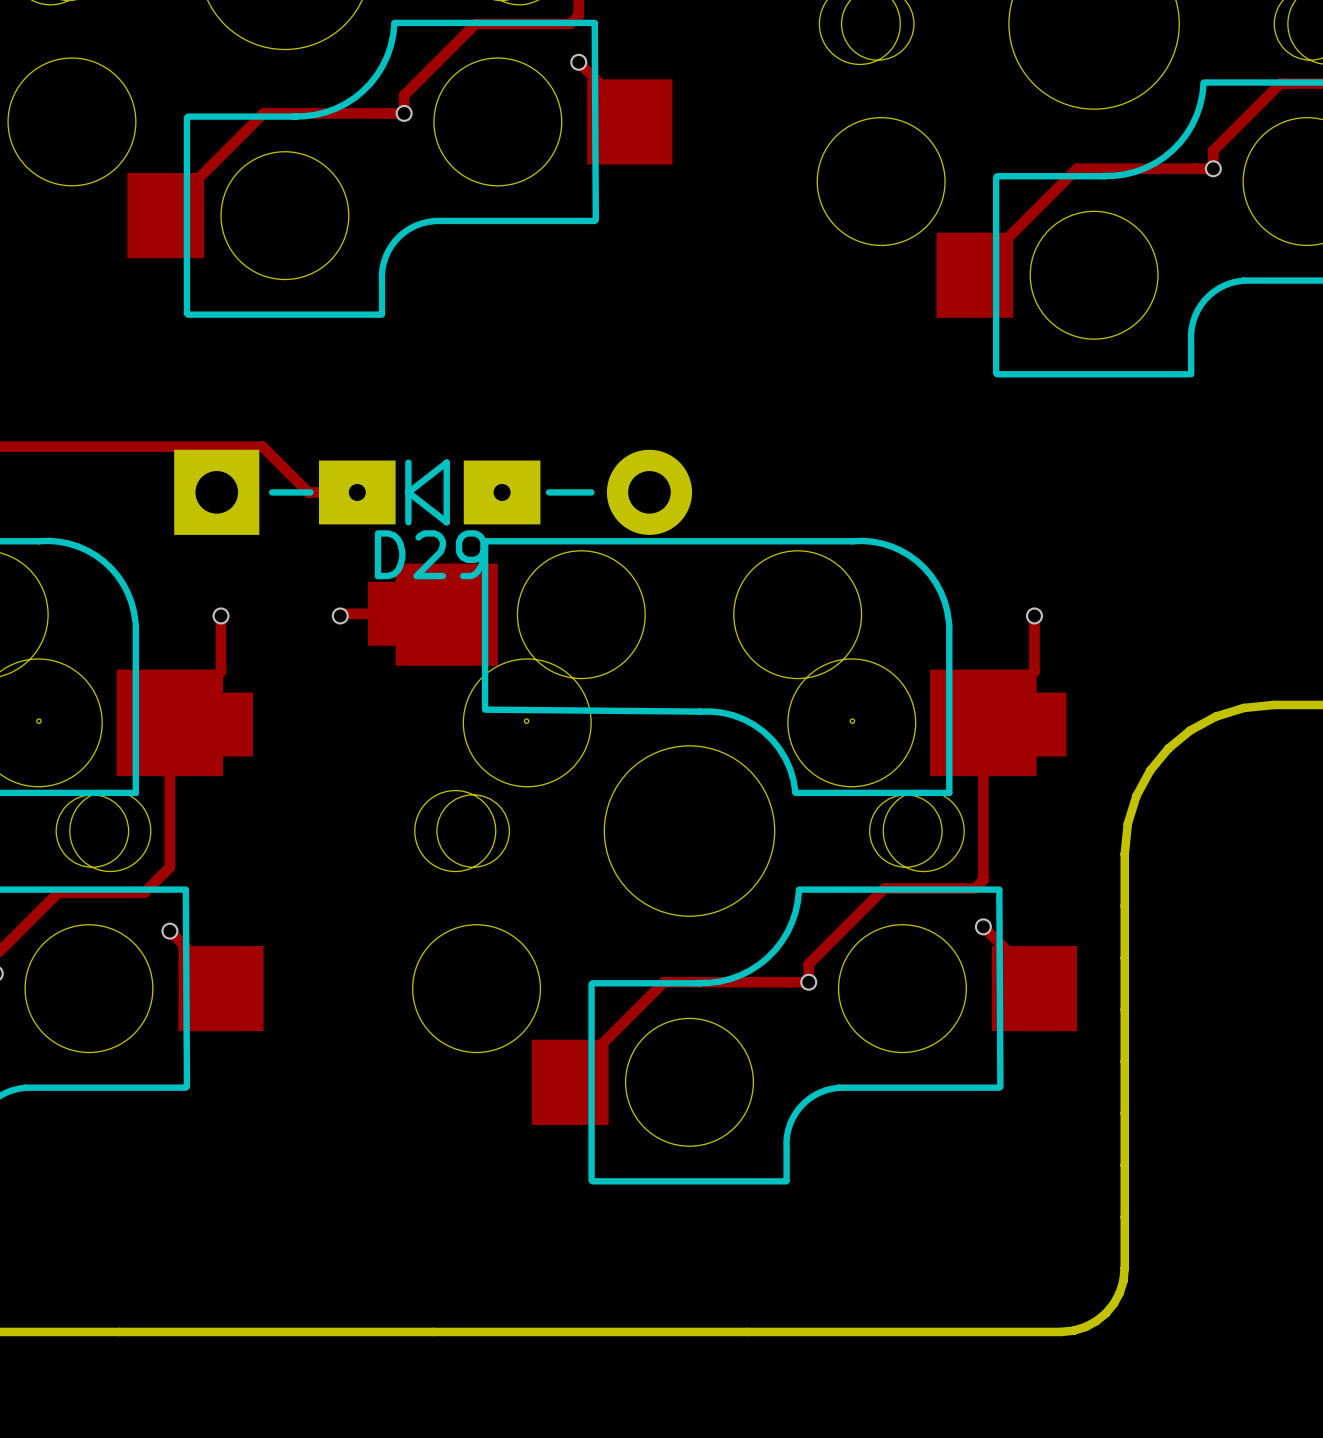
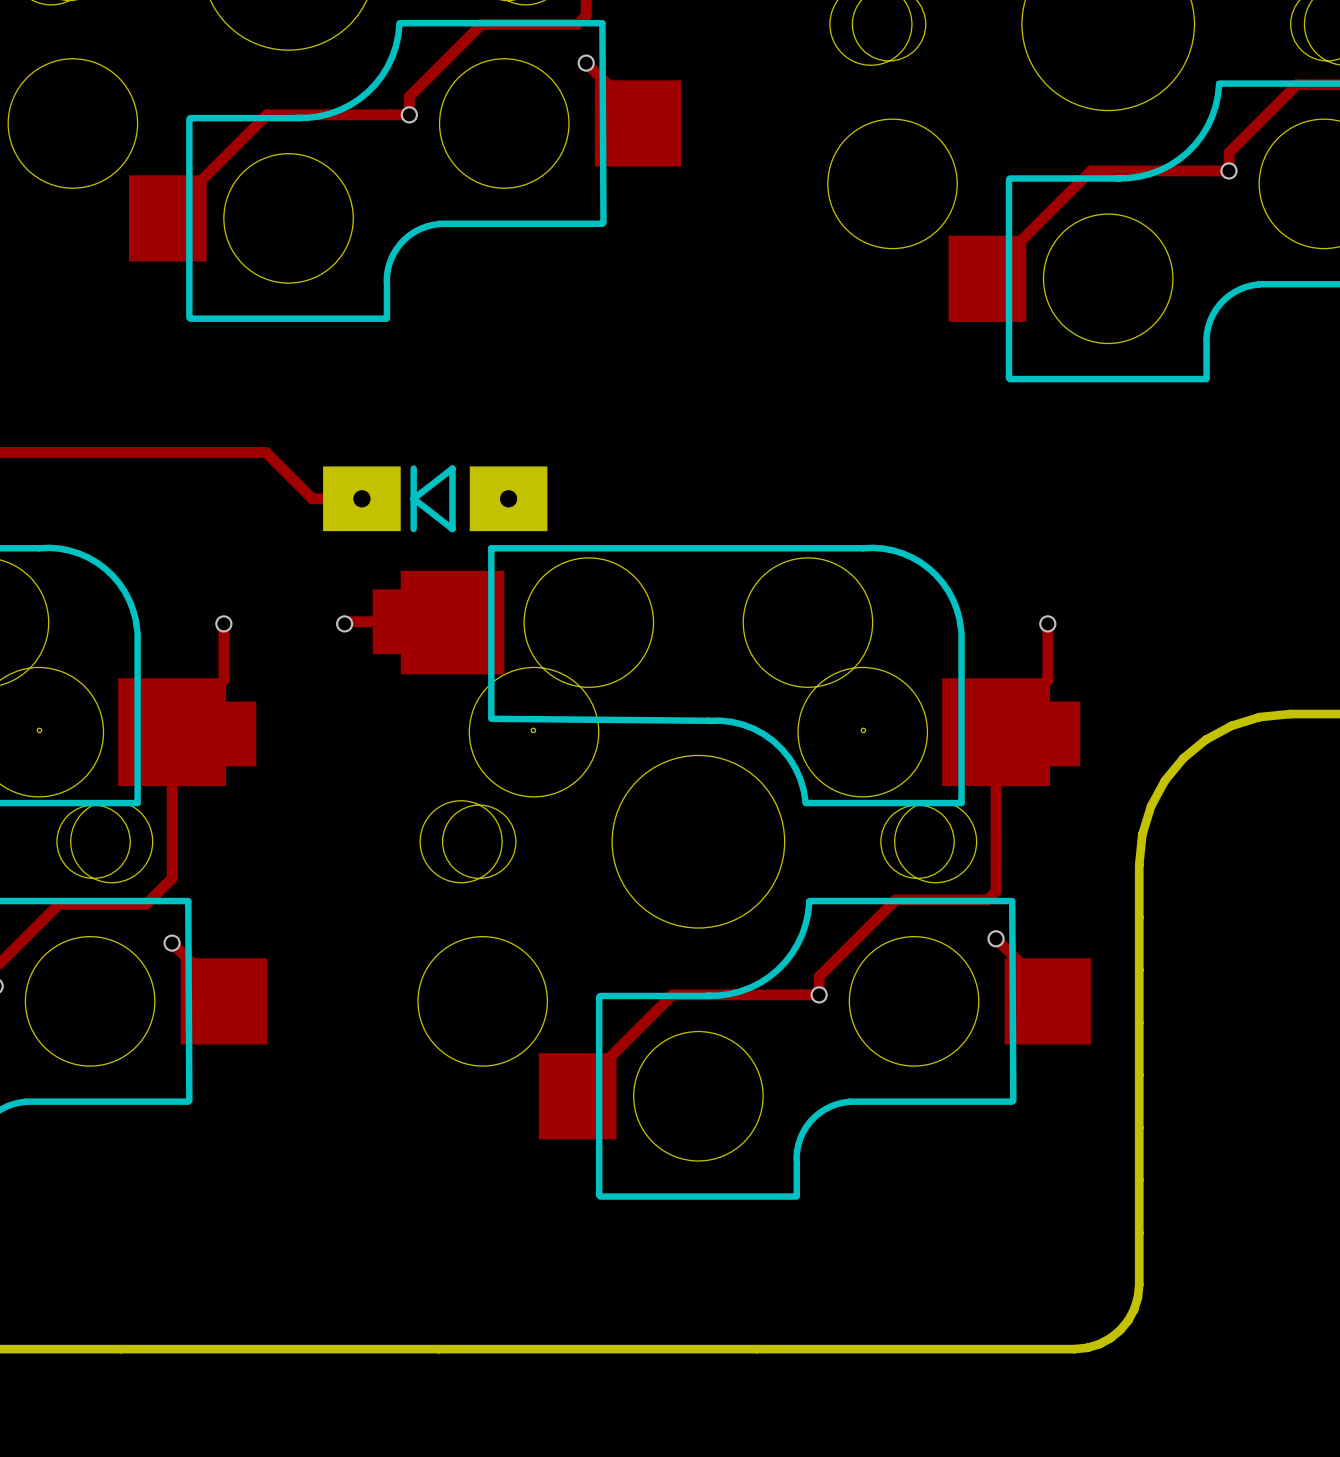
D29: (433, 492) -> none

